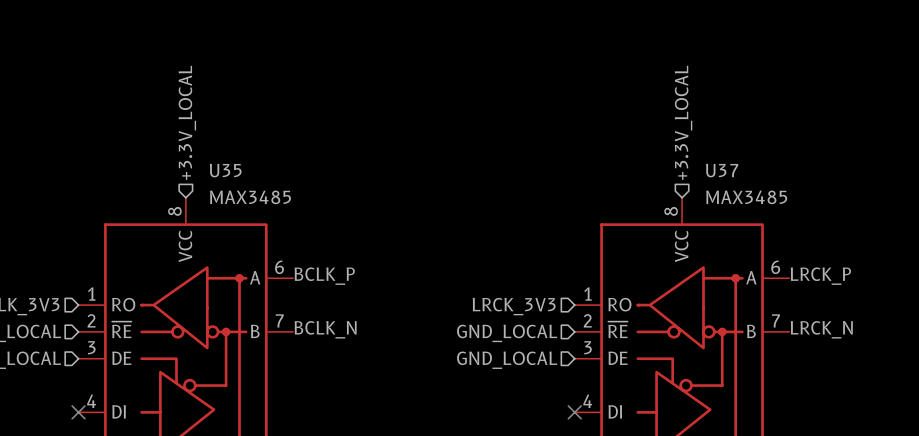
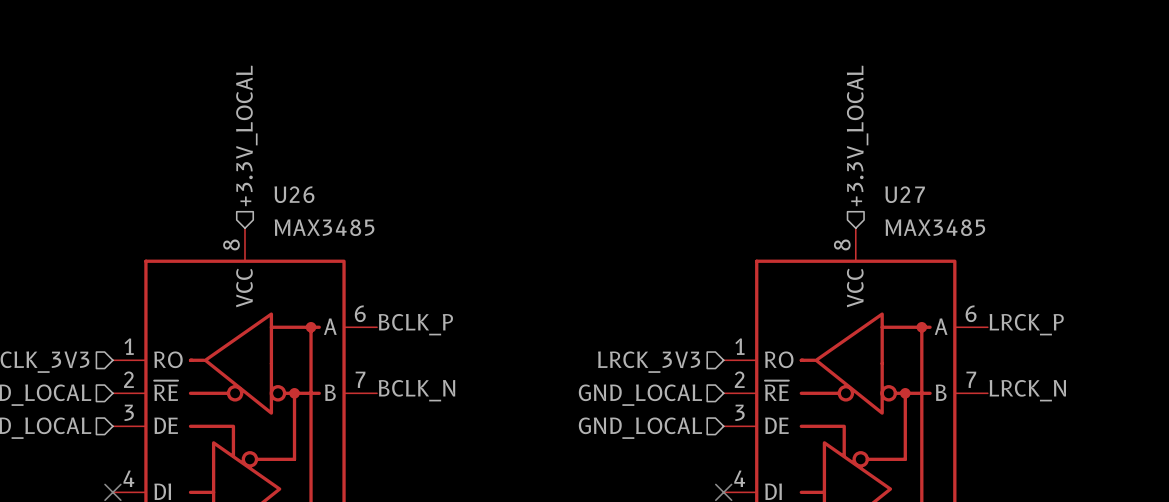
U35 name: U35 (225, 170) -> U26 (294, 194)
U37 name: U37 (722, 170) -> U27 (905, 194)

